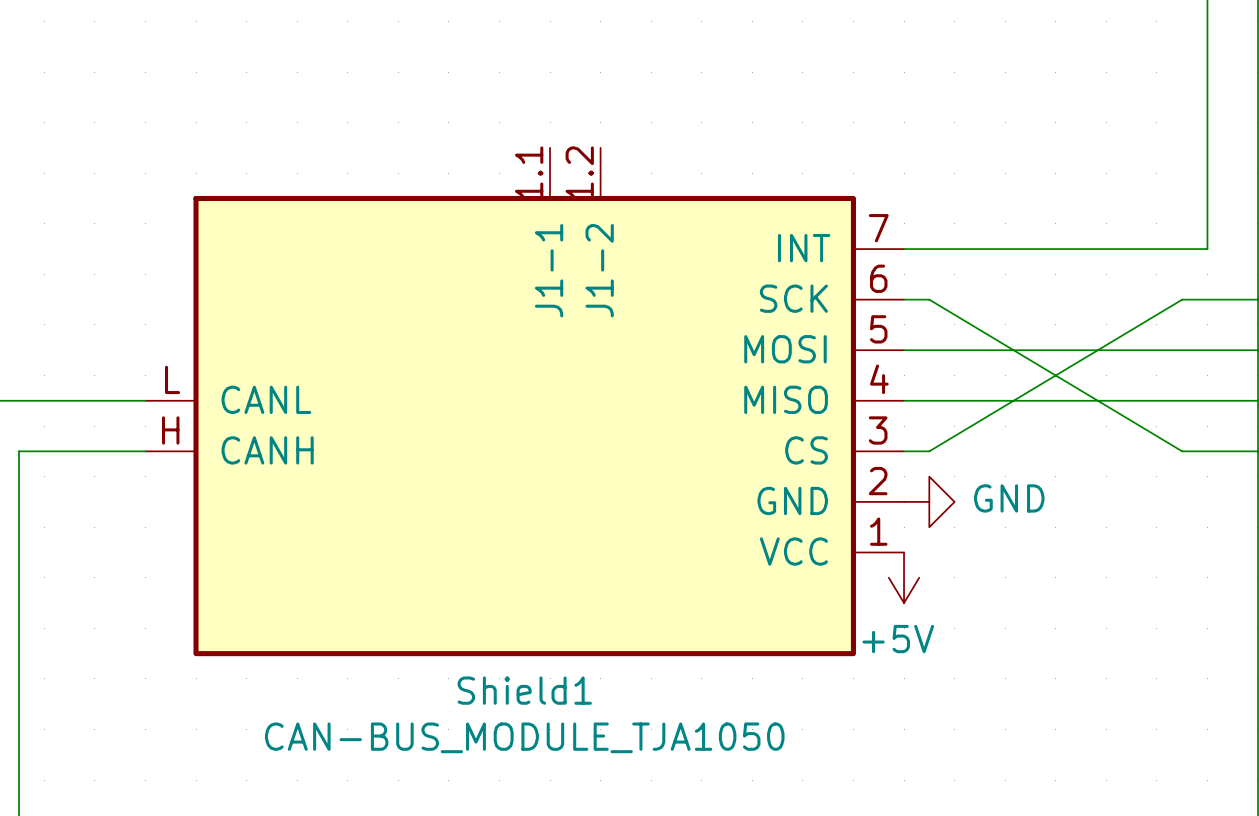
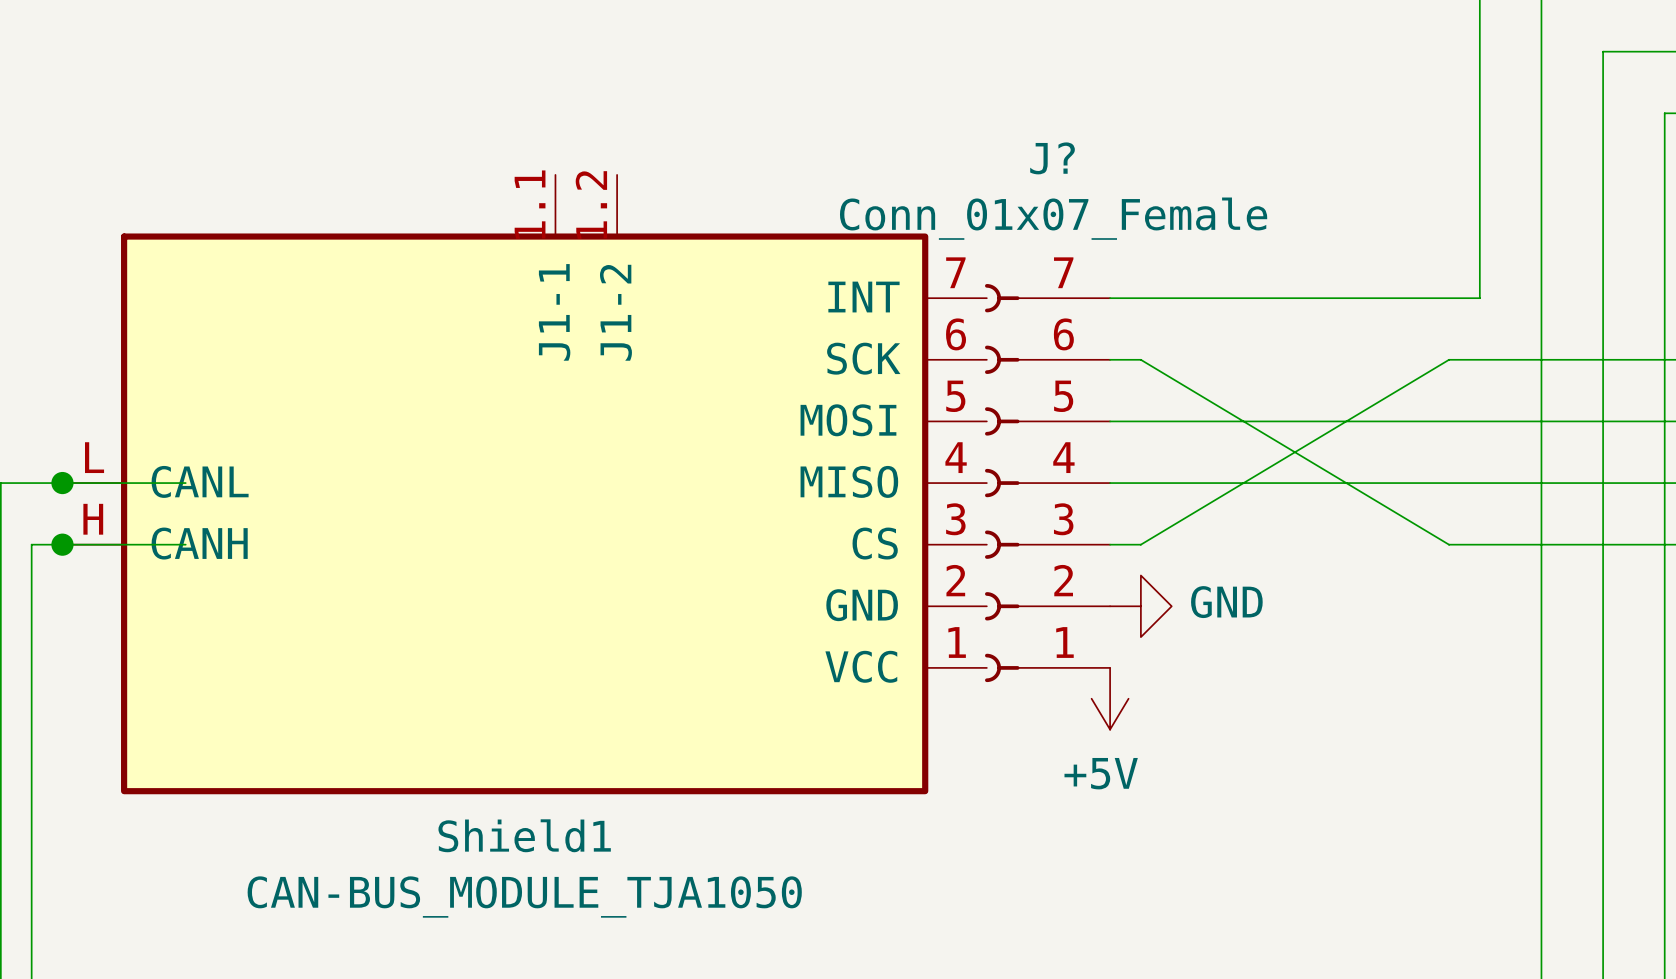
junction: none -> (62, 483)
J?: none -> Conn_01x07_Female (1047, 483)
Shield1 position: (524, 402) -> (524, 484)
junction: none -> (62, 544)

